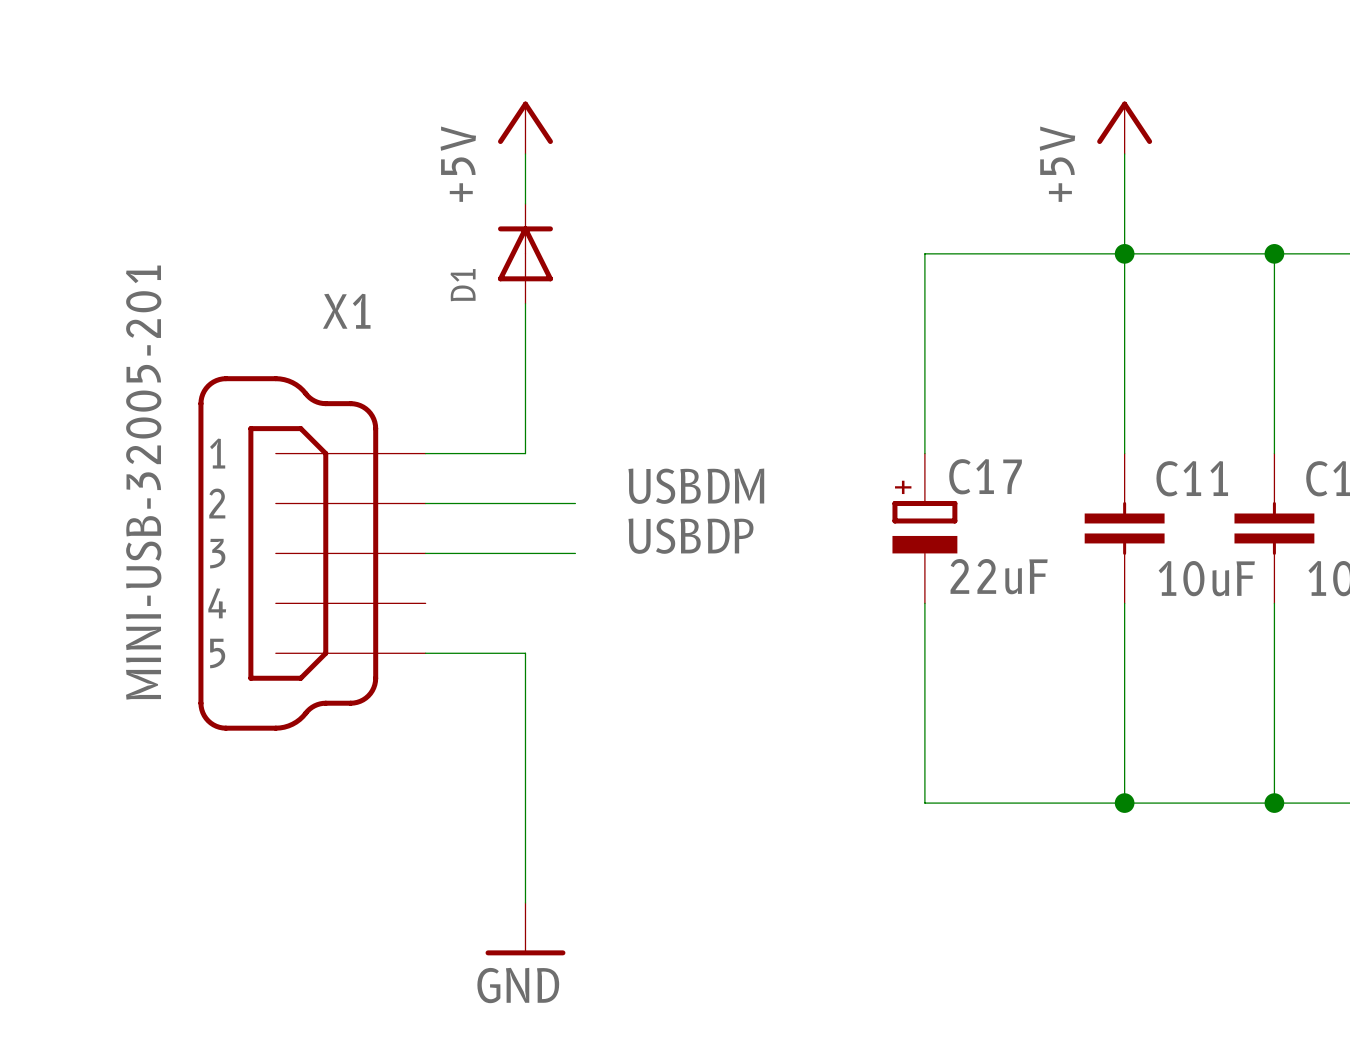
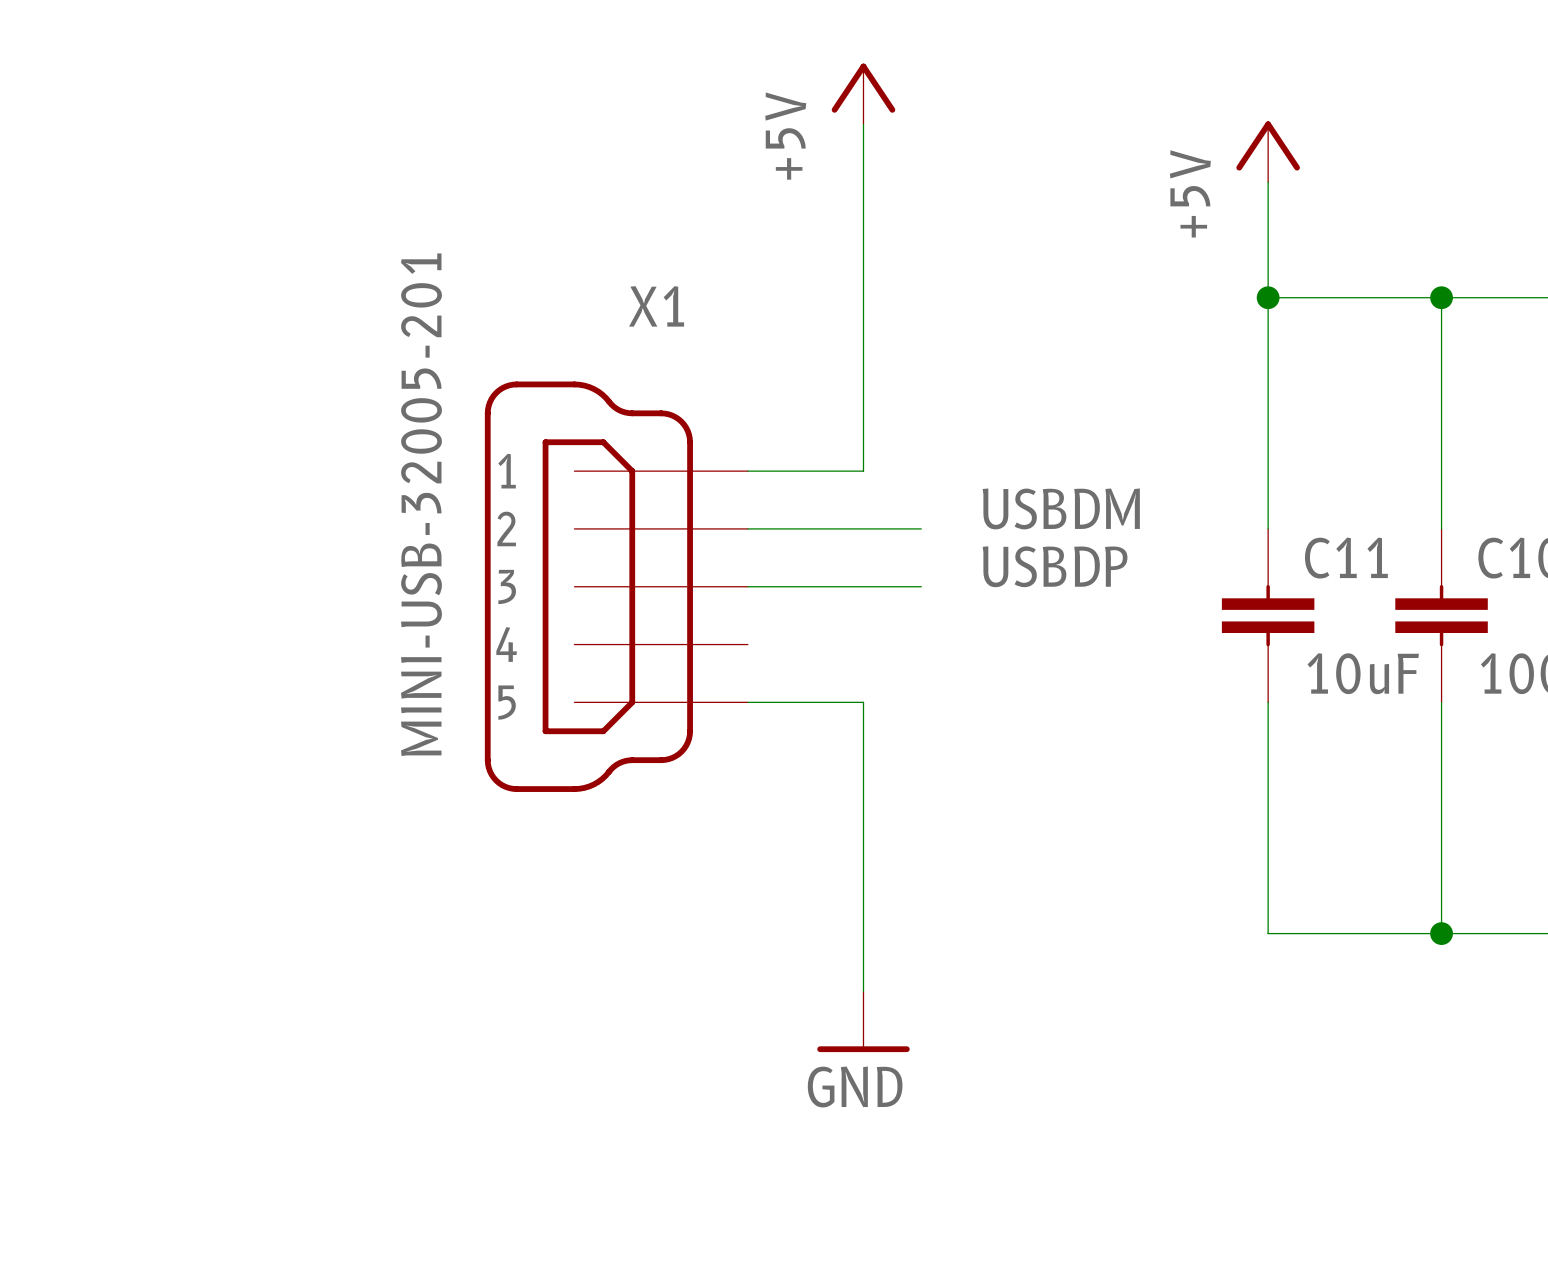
wire: none -> (863, 124) (863, 471) (747, 471)
power symbol position: +5V (525, 127) -> +5V (863, 93)
wire: (525, 154) (525, 203) -> none
D1: (525, 253) -> none
wire: (1124, 253) (924, 253) (924, 453) -> none
wire: (525, 303) (525, 453) (425, 453) -> none
label position: USBDM (696, 486) -> USBDM (1061, 508)
wire: (425, 503) (575, 503) -> (747, 528) (921, 528)
C17: 22uF (924, 528) -> none
label position: USBDP (690, 536) -> USBDP (1055, 566)
X1 position: (312, 553) -> (616, 586)
wire: (425, 553) (575, 553) -> (747, 586) (921, 586)
wire: (924, 603) (924, 803) (1124, 803) -> none
wire: (425, 653) (525, 653) (525, 902) -> (747, 702) (863, 702) (863, 991)
junction: (1124, 803) -> none
power symbol position: GND (525, 929) -> GND (863, 1021)

